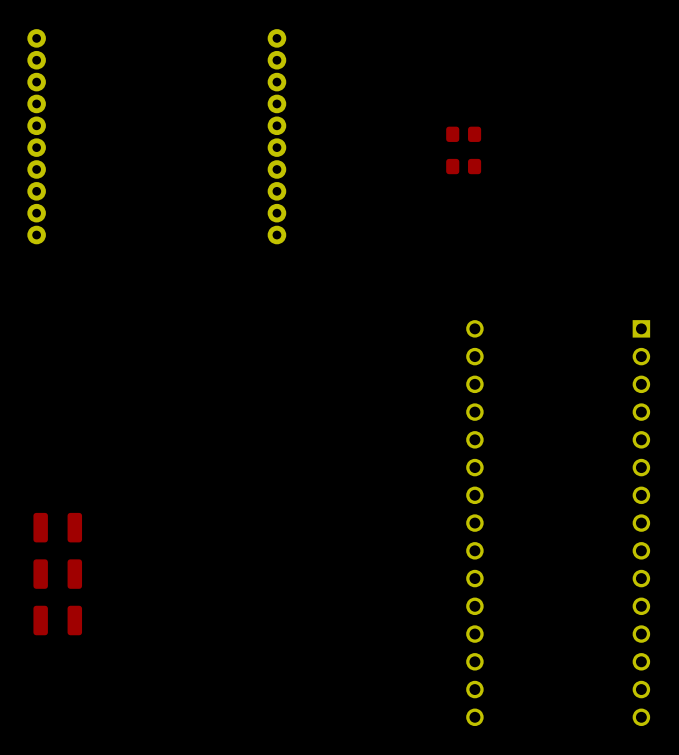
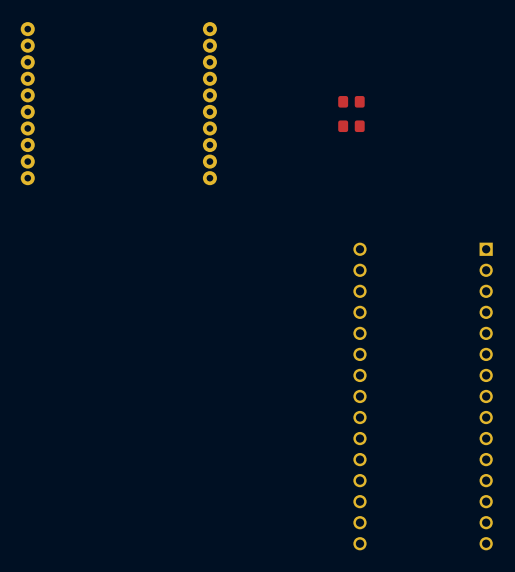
part: (57, 527) -> none
part: (57, 574) -> none
part: (57, 620) -> none

